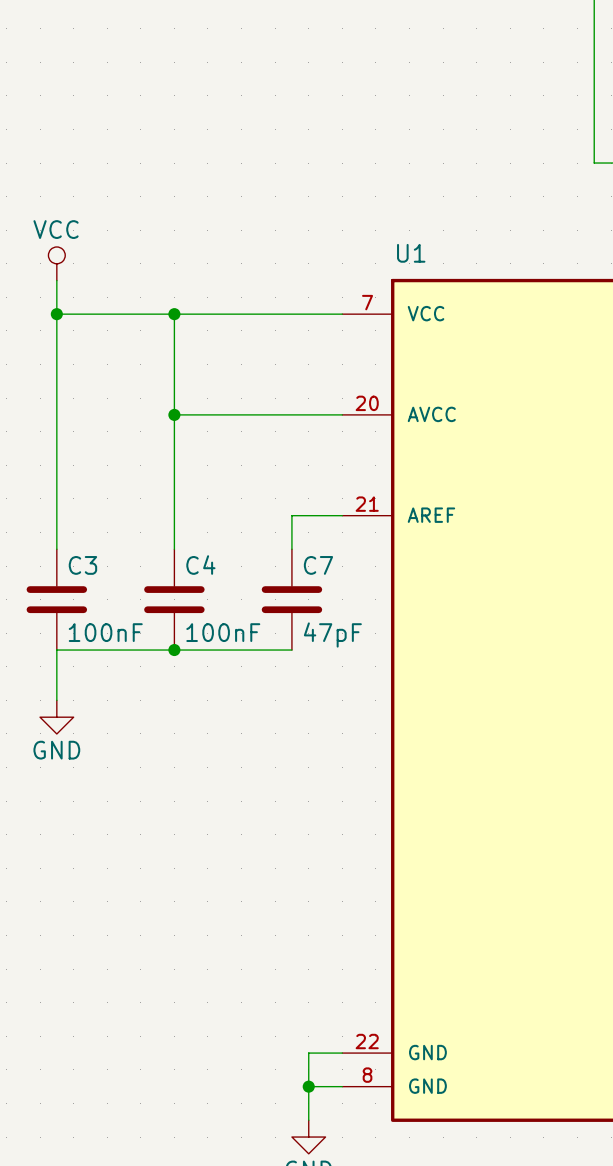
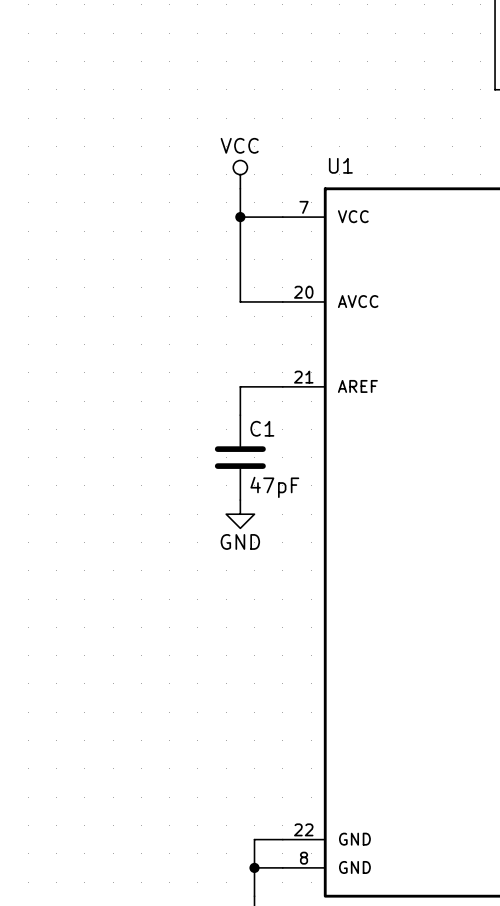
power symbol position: VCC (56, 263) -> VCC (240, 174)
wire: (56, 280) (56, 549) -> none
wire: (56, 314) (291, 314) -> none
junction: (56, 314) -> none
wire: (174, 314) (174, 549) -> none
junction: (174, 314) -> none
junction: none -> (240, 217)
wire: (174, 414) (291, 414) -> (240, 188) (240, 301)
junction: (174, 414) -> none
C7 name: C7 (318, 565) -> C1 (262, 428)
C3: 100nF (56, 599) -> none
C4: 100nF (174, 599) -> none
junction: (174, 650) -> none
wire: (291, 650) (56, 650) (56, 700) -> none
power symbol position: GND (56, 717) -> GND (240, 514)

